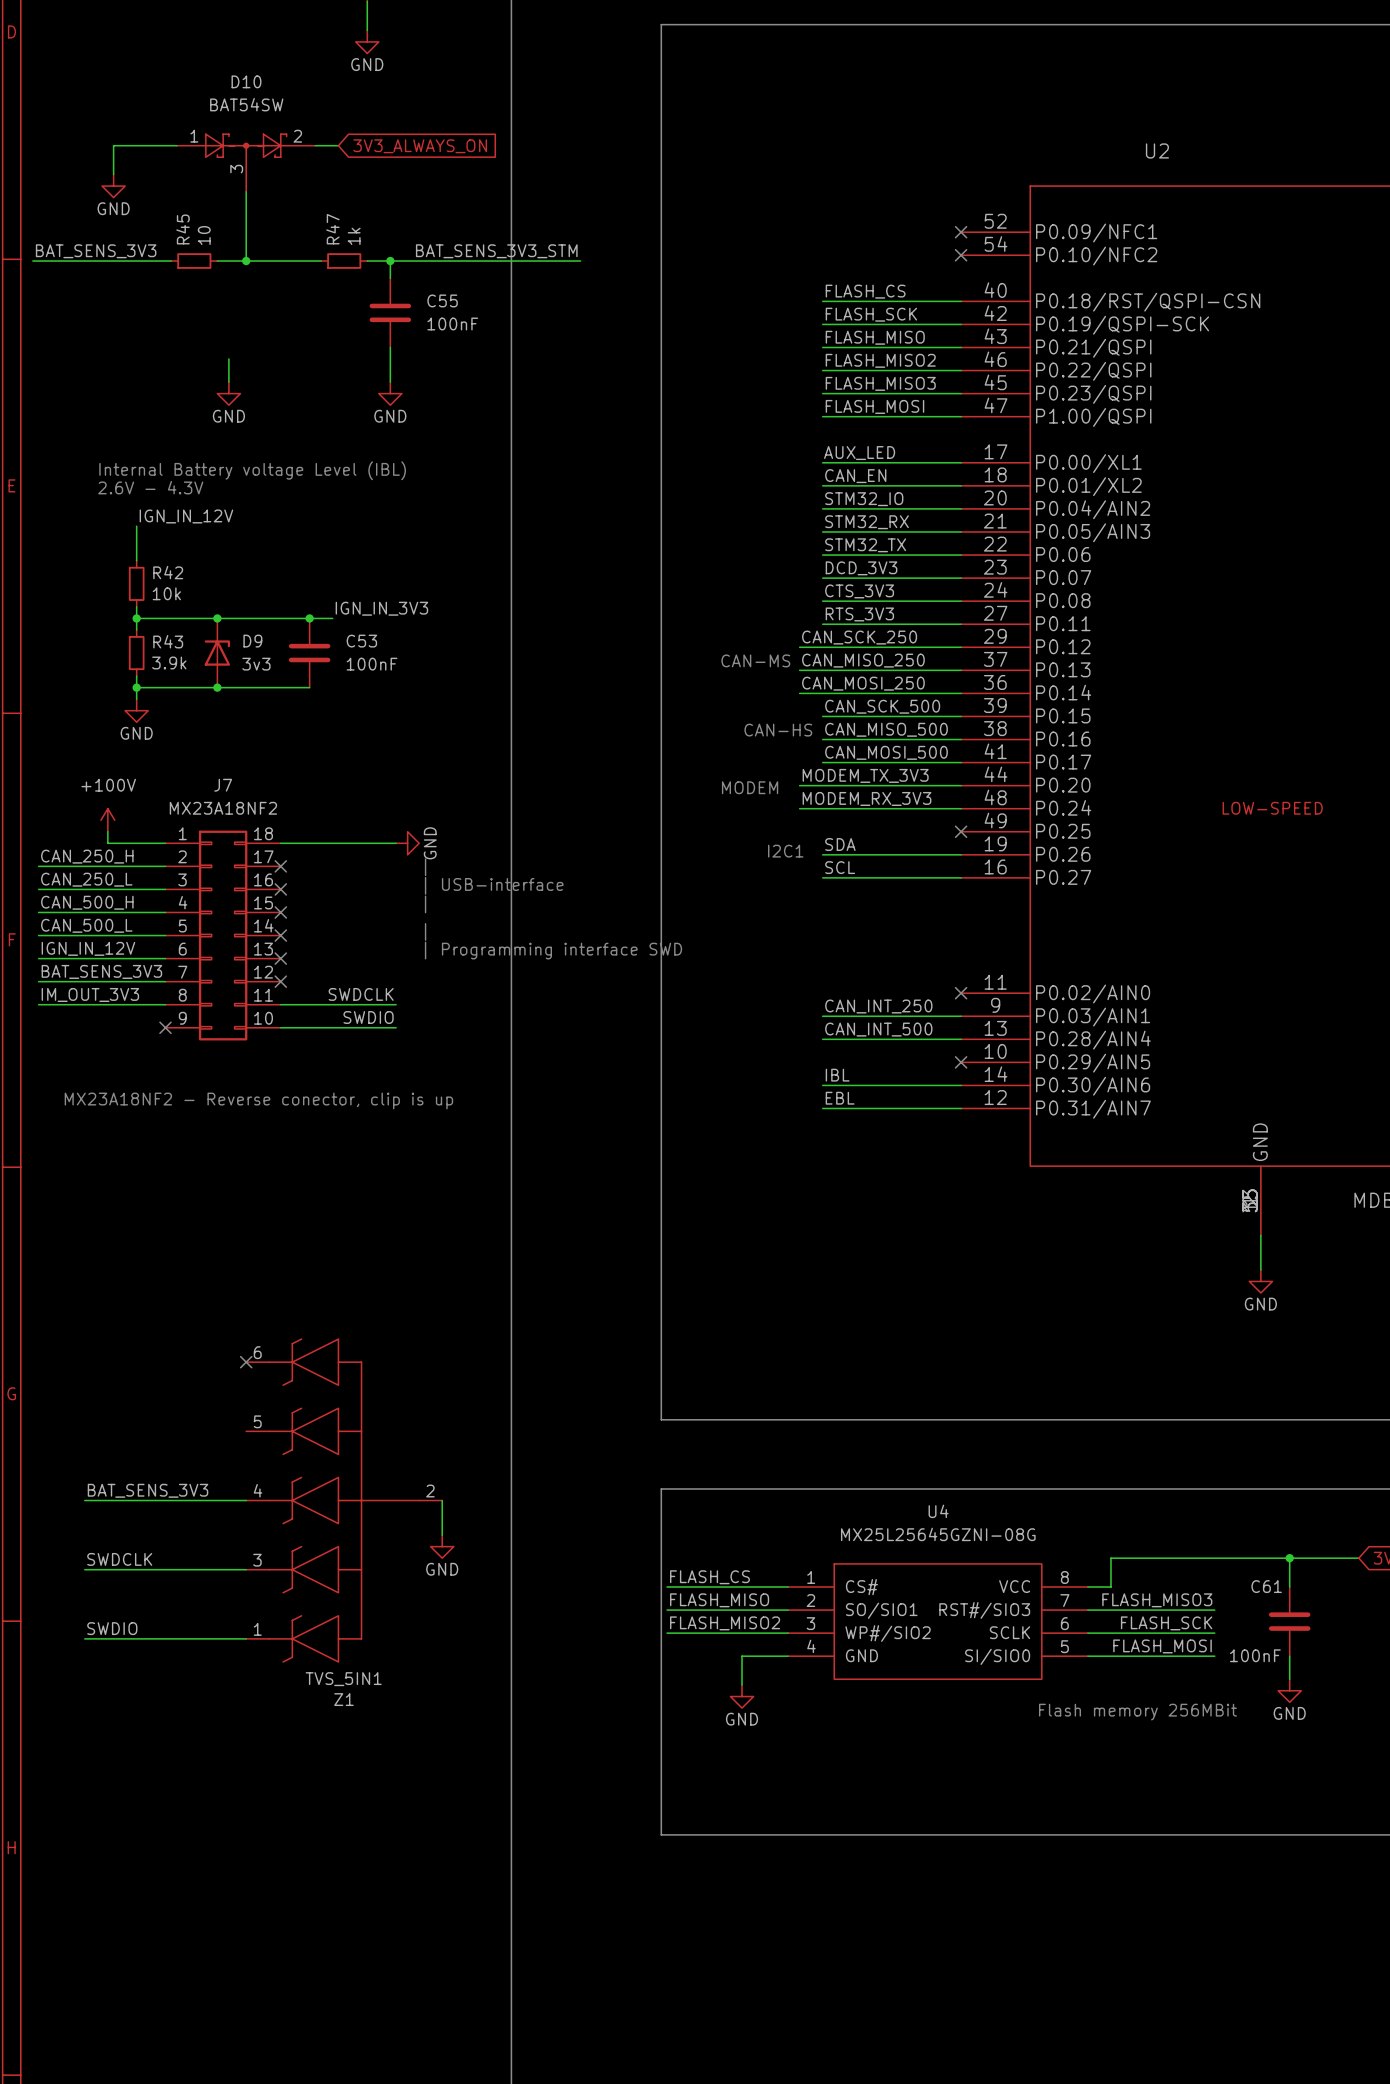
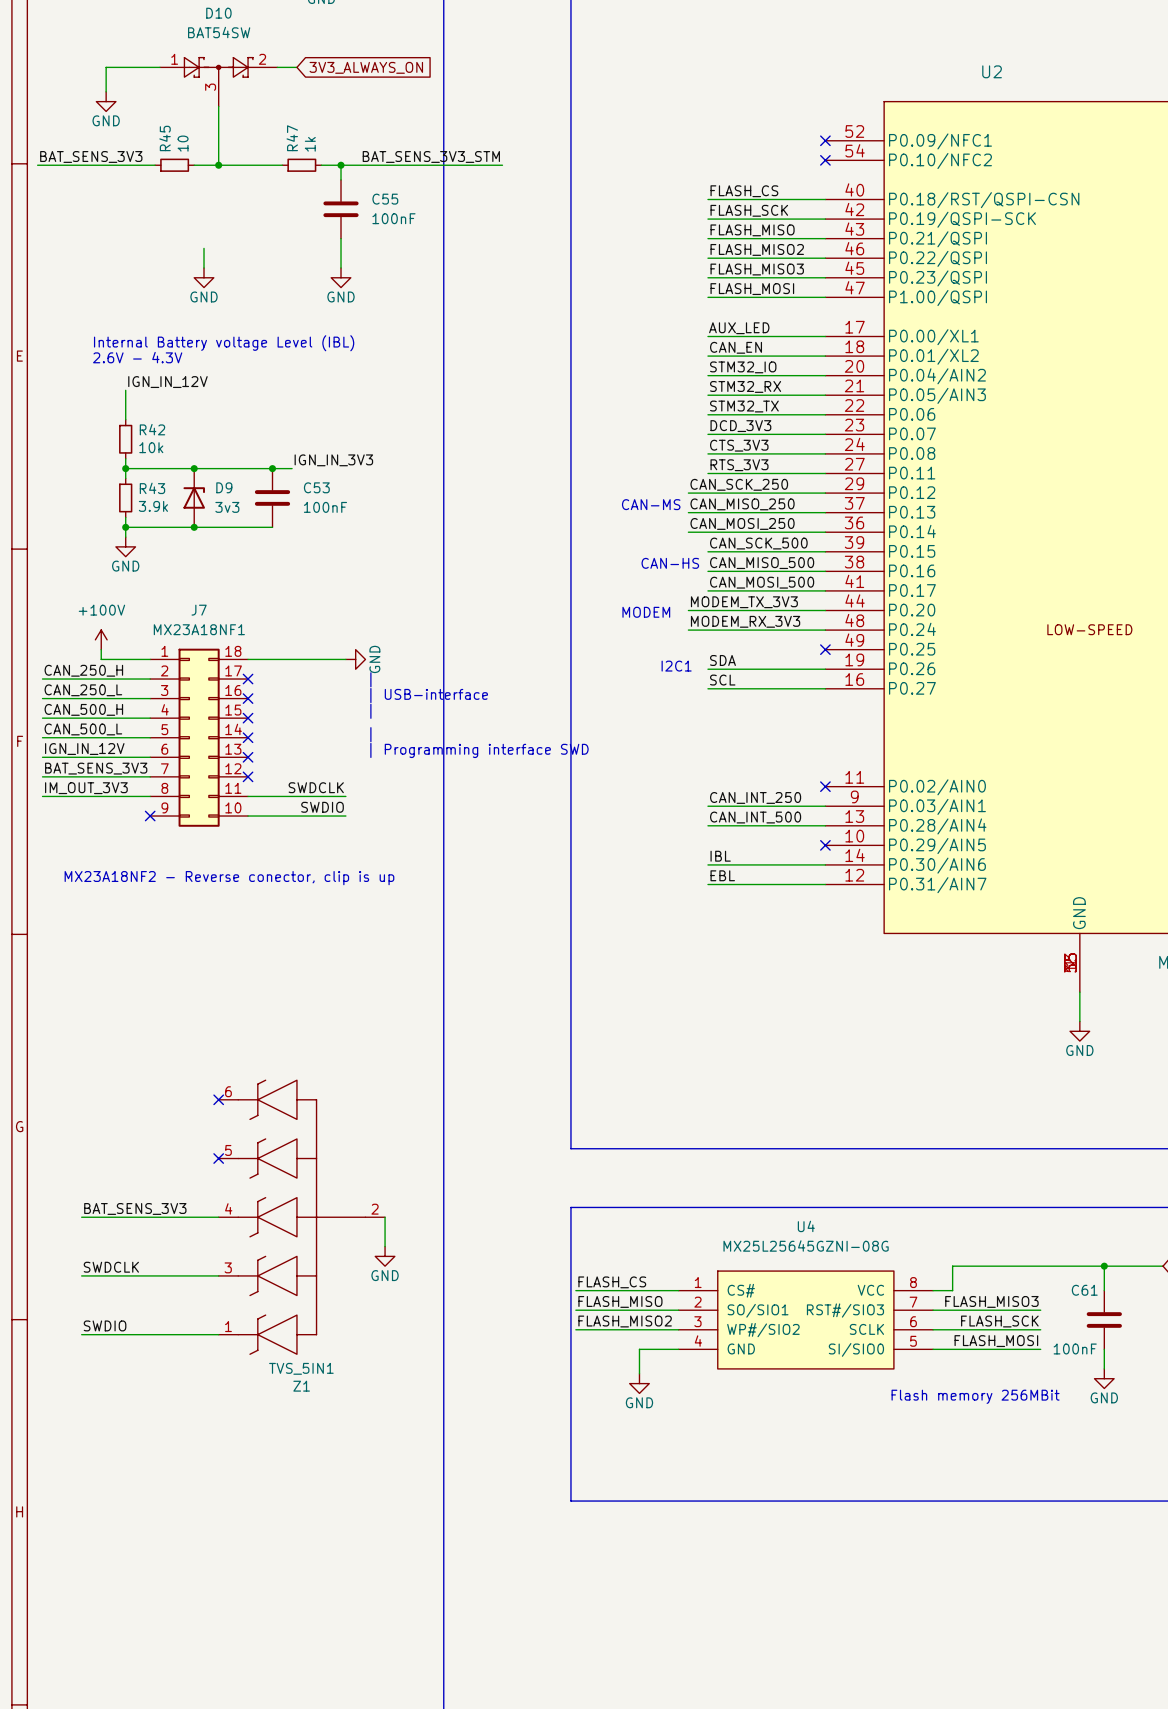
J7 value: MX23A18NF2 (223, 808) -> MX23A18NF1 (199, 629)
no-connect mark: none -> (218, 1158)

